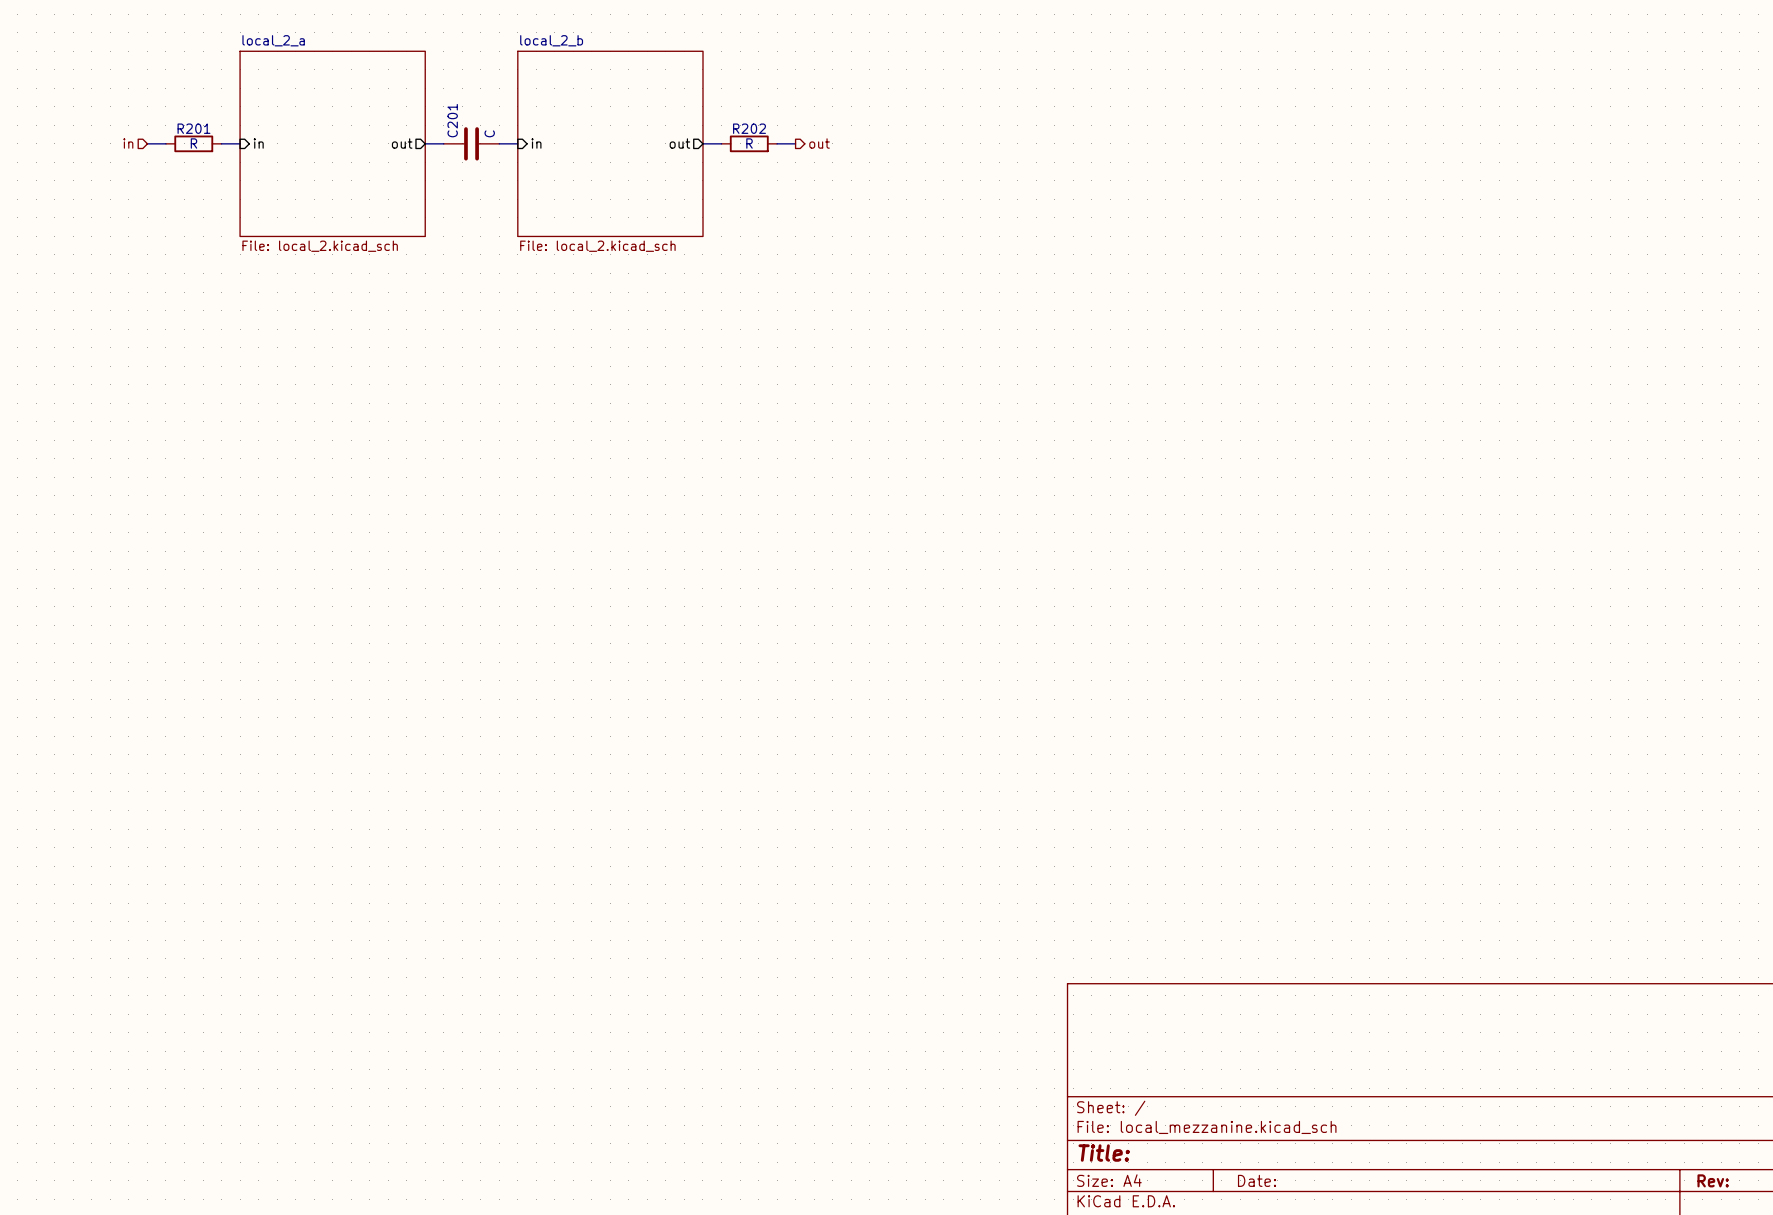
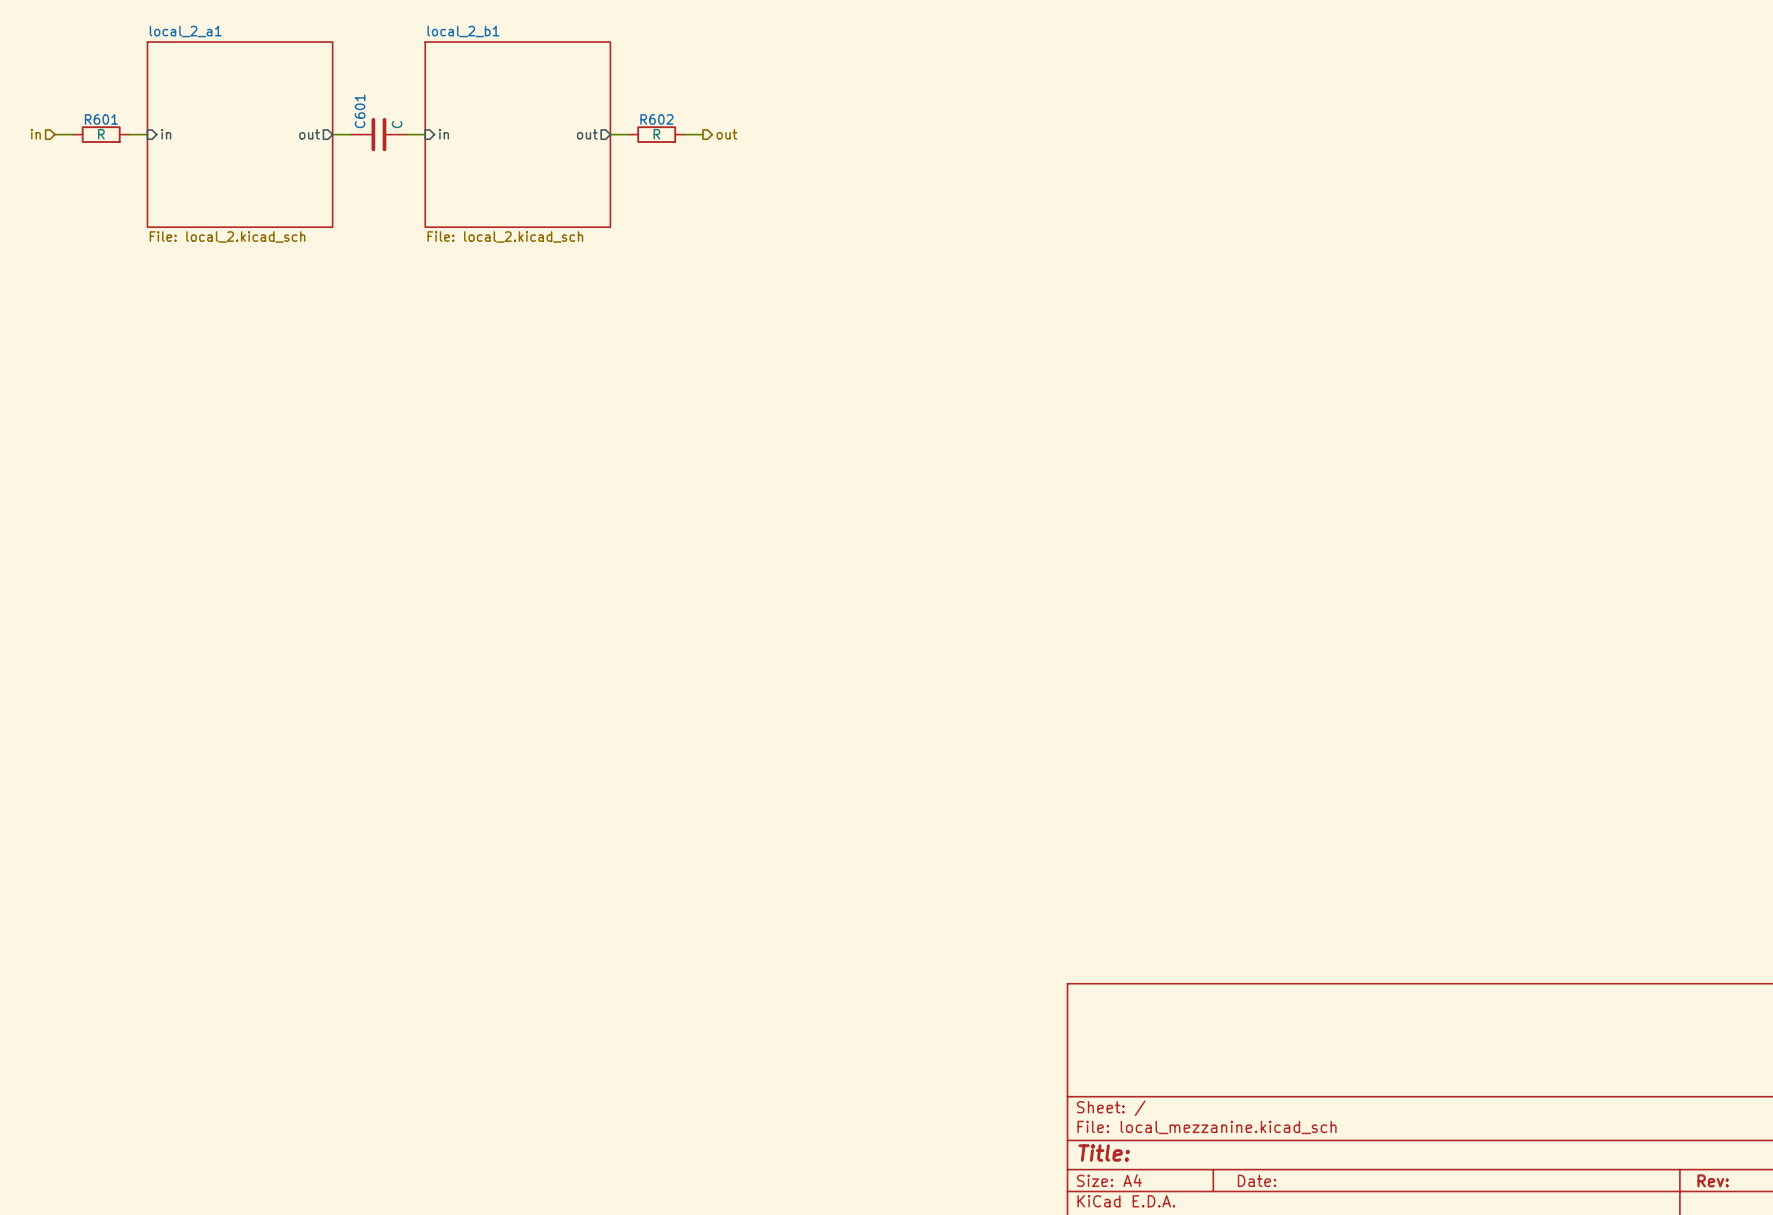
R601: none -> R (101, 134)
sheet pin: none -> in (166, 134)
sheet local_2_a1: none -> File: local_2.kicad_sch (240, 134)
sheet pin: none -> out (309, 134)
C601: none -> C (378, 134)
sheet pin: none -> in (443, 134)
sheet local_2_b1: none -> File: local_2.kicad_sch (517, 134)
sheet pin: none -> out (587, 134)
R602: none -> R (656, 134)
hierarchical label position: in (128, 143) -> in (35, 134)
wire: (147, 143) (165, 143) -> (54, 134) (73, 134)
R201: R (193, 143) -> none
wire: (221, 143) (240, 143) -> (128, 134) (147, 134)
sheet pin: in (258, 143) -> none
sheet local_2_a: File: local_2.kicad_sch (332, 143) -> none
sheet pin: out (402, 143) -> none
wire: (425, 143) (443, 143) -> (332, 134) (351, 134)
C201: C (471, 143) -> none
wire: (499, 143) (517, 143) -> (406, 134) (425, 134)
sheet pin: in (536, 143) -> none
sheet local_2_b: File: local_2.kicad_sch (610, 143) -> none
sheet pin: out (679, 143) -> none
wire: (702, 143) (721, 143) -> (610, 134) (628, 134)
R202: R (749, 143) -> none
wire: (777, 143) (795, 143) -> (684, 134) (702, 134)
hierarchical label position: out (819, 143) -> out (726, 134)

